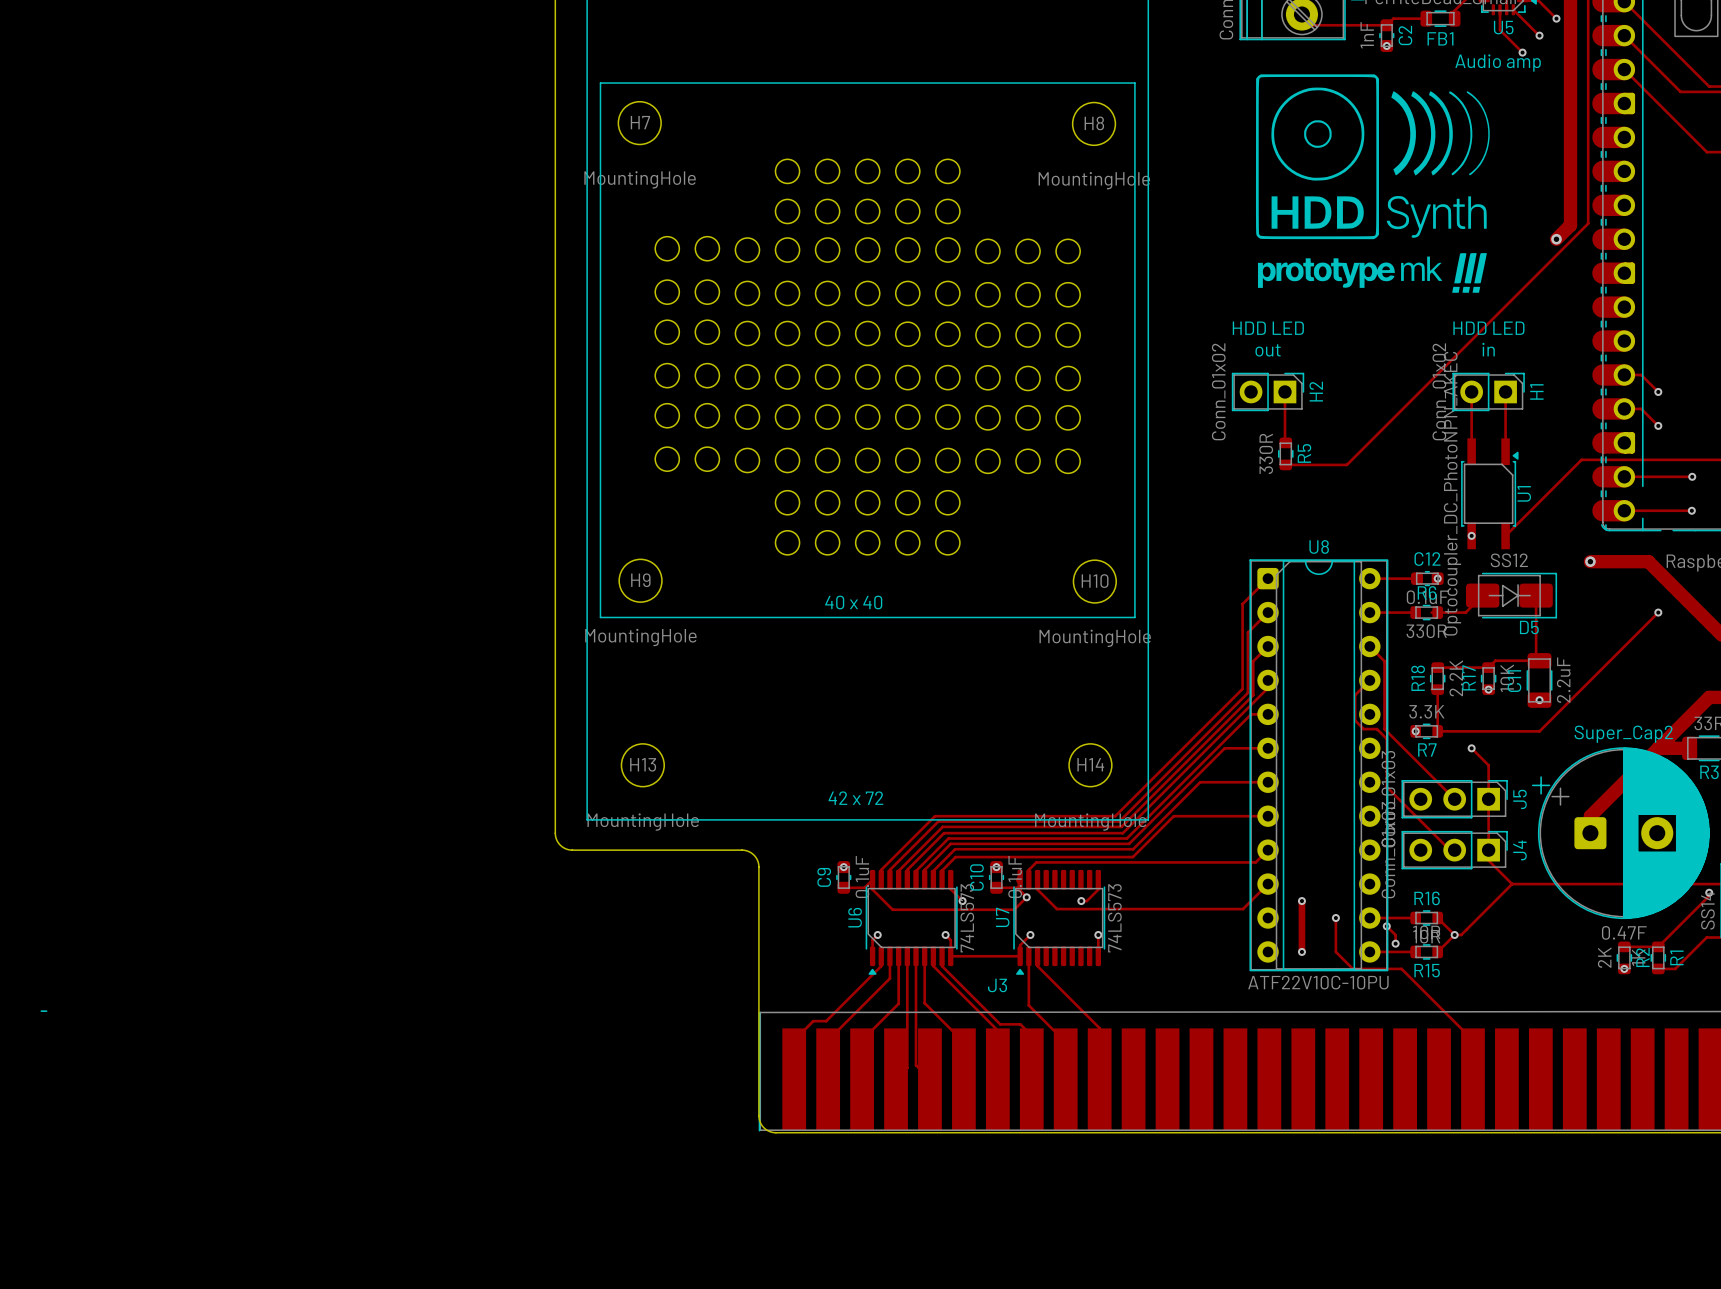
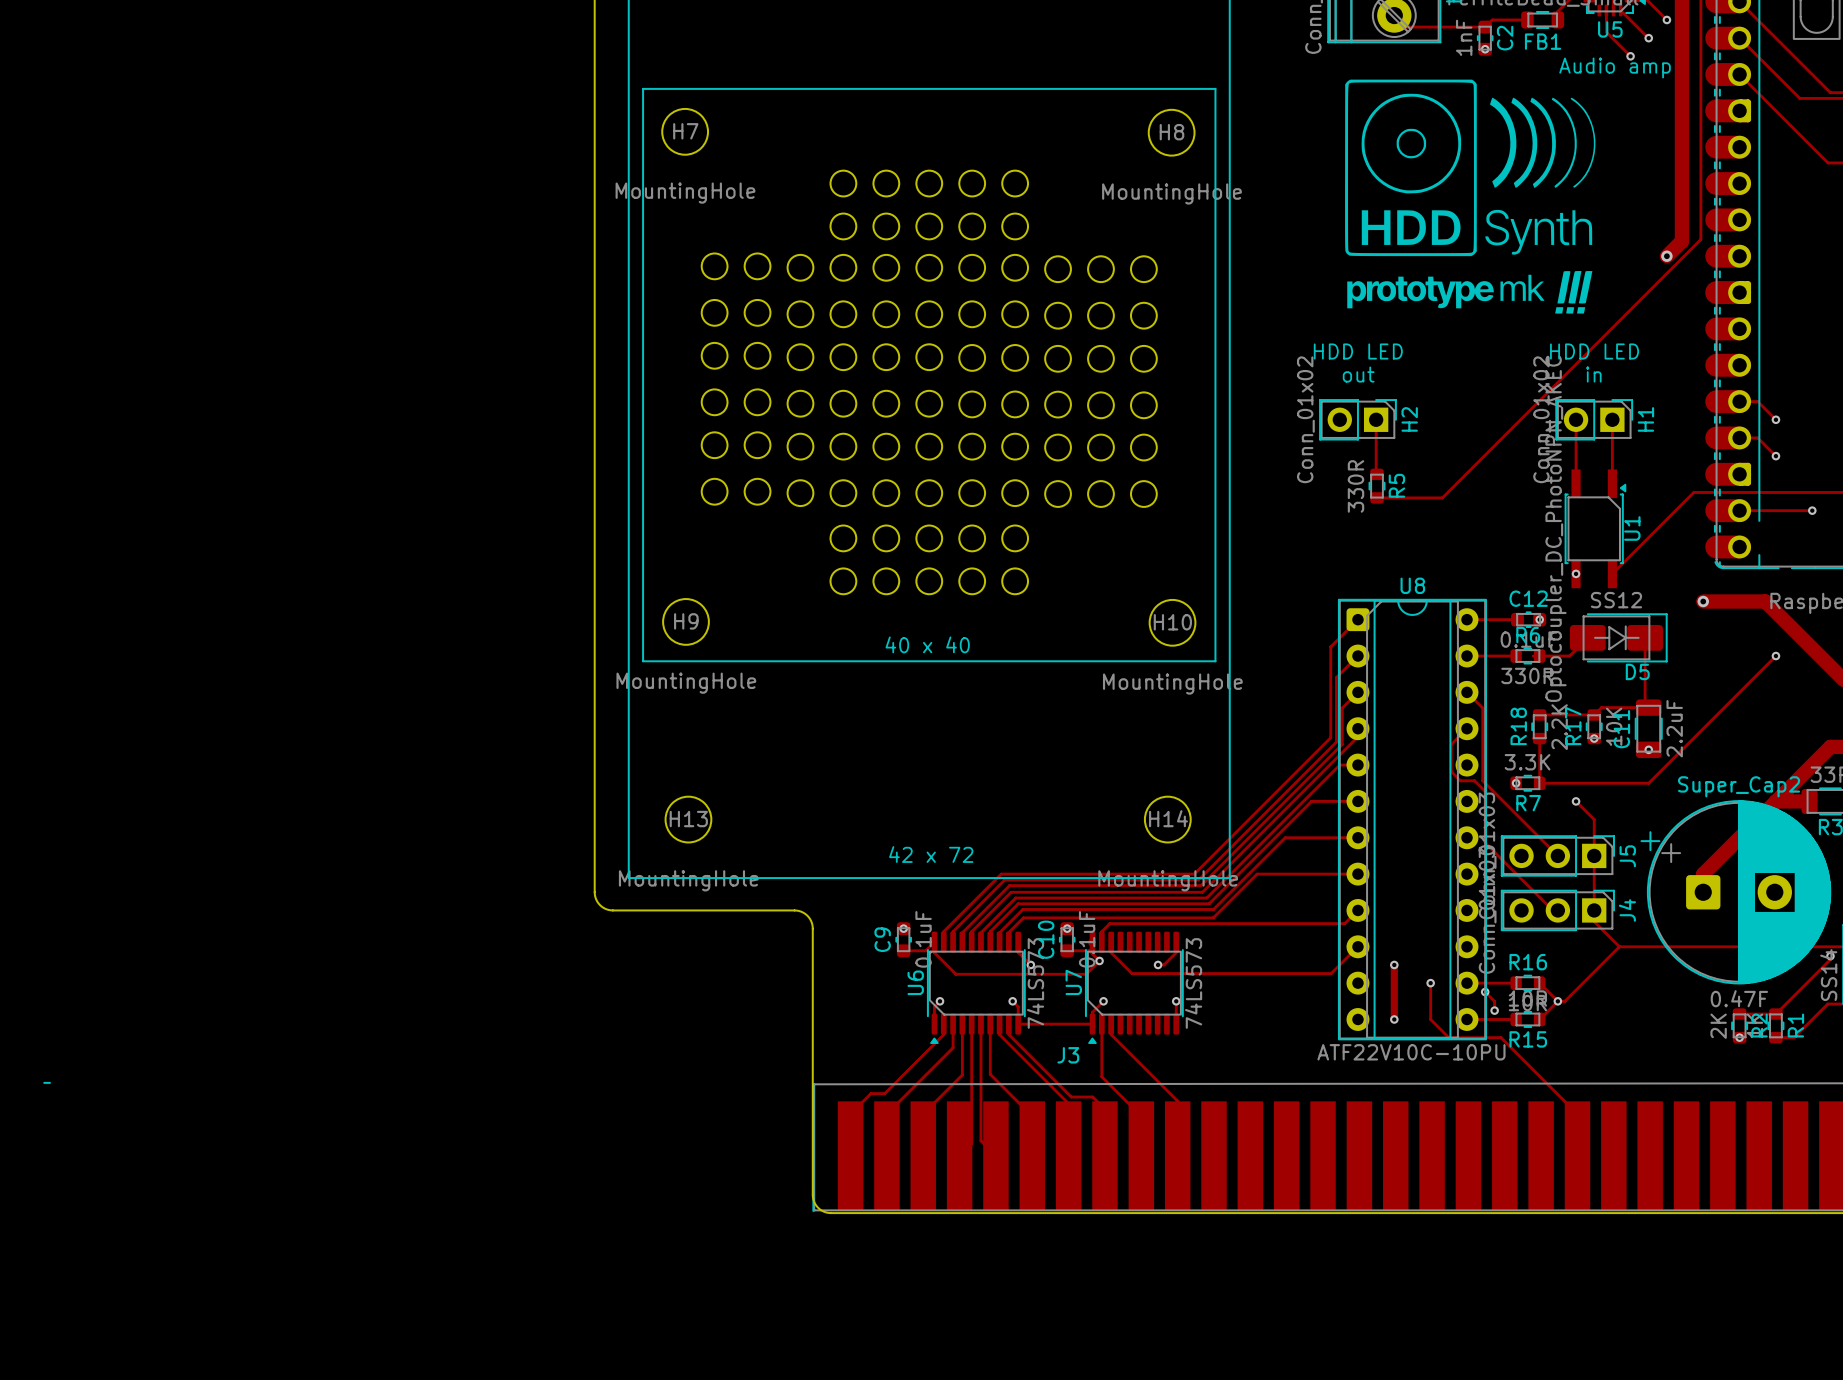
track: (1613, 510) (1691, 510) -> none
via: (1691, 510) -> none

